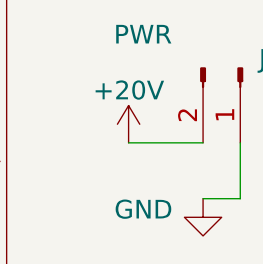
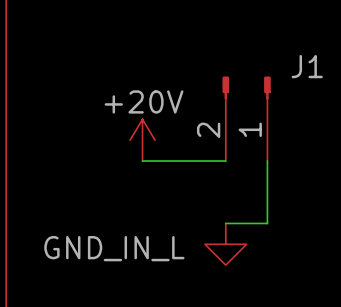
J1 value: PWR (143, 34) -> none
power symbol: GND (203, 217) -> GND_IN_L (225, 244)

